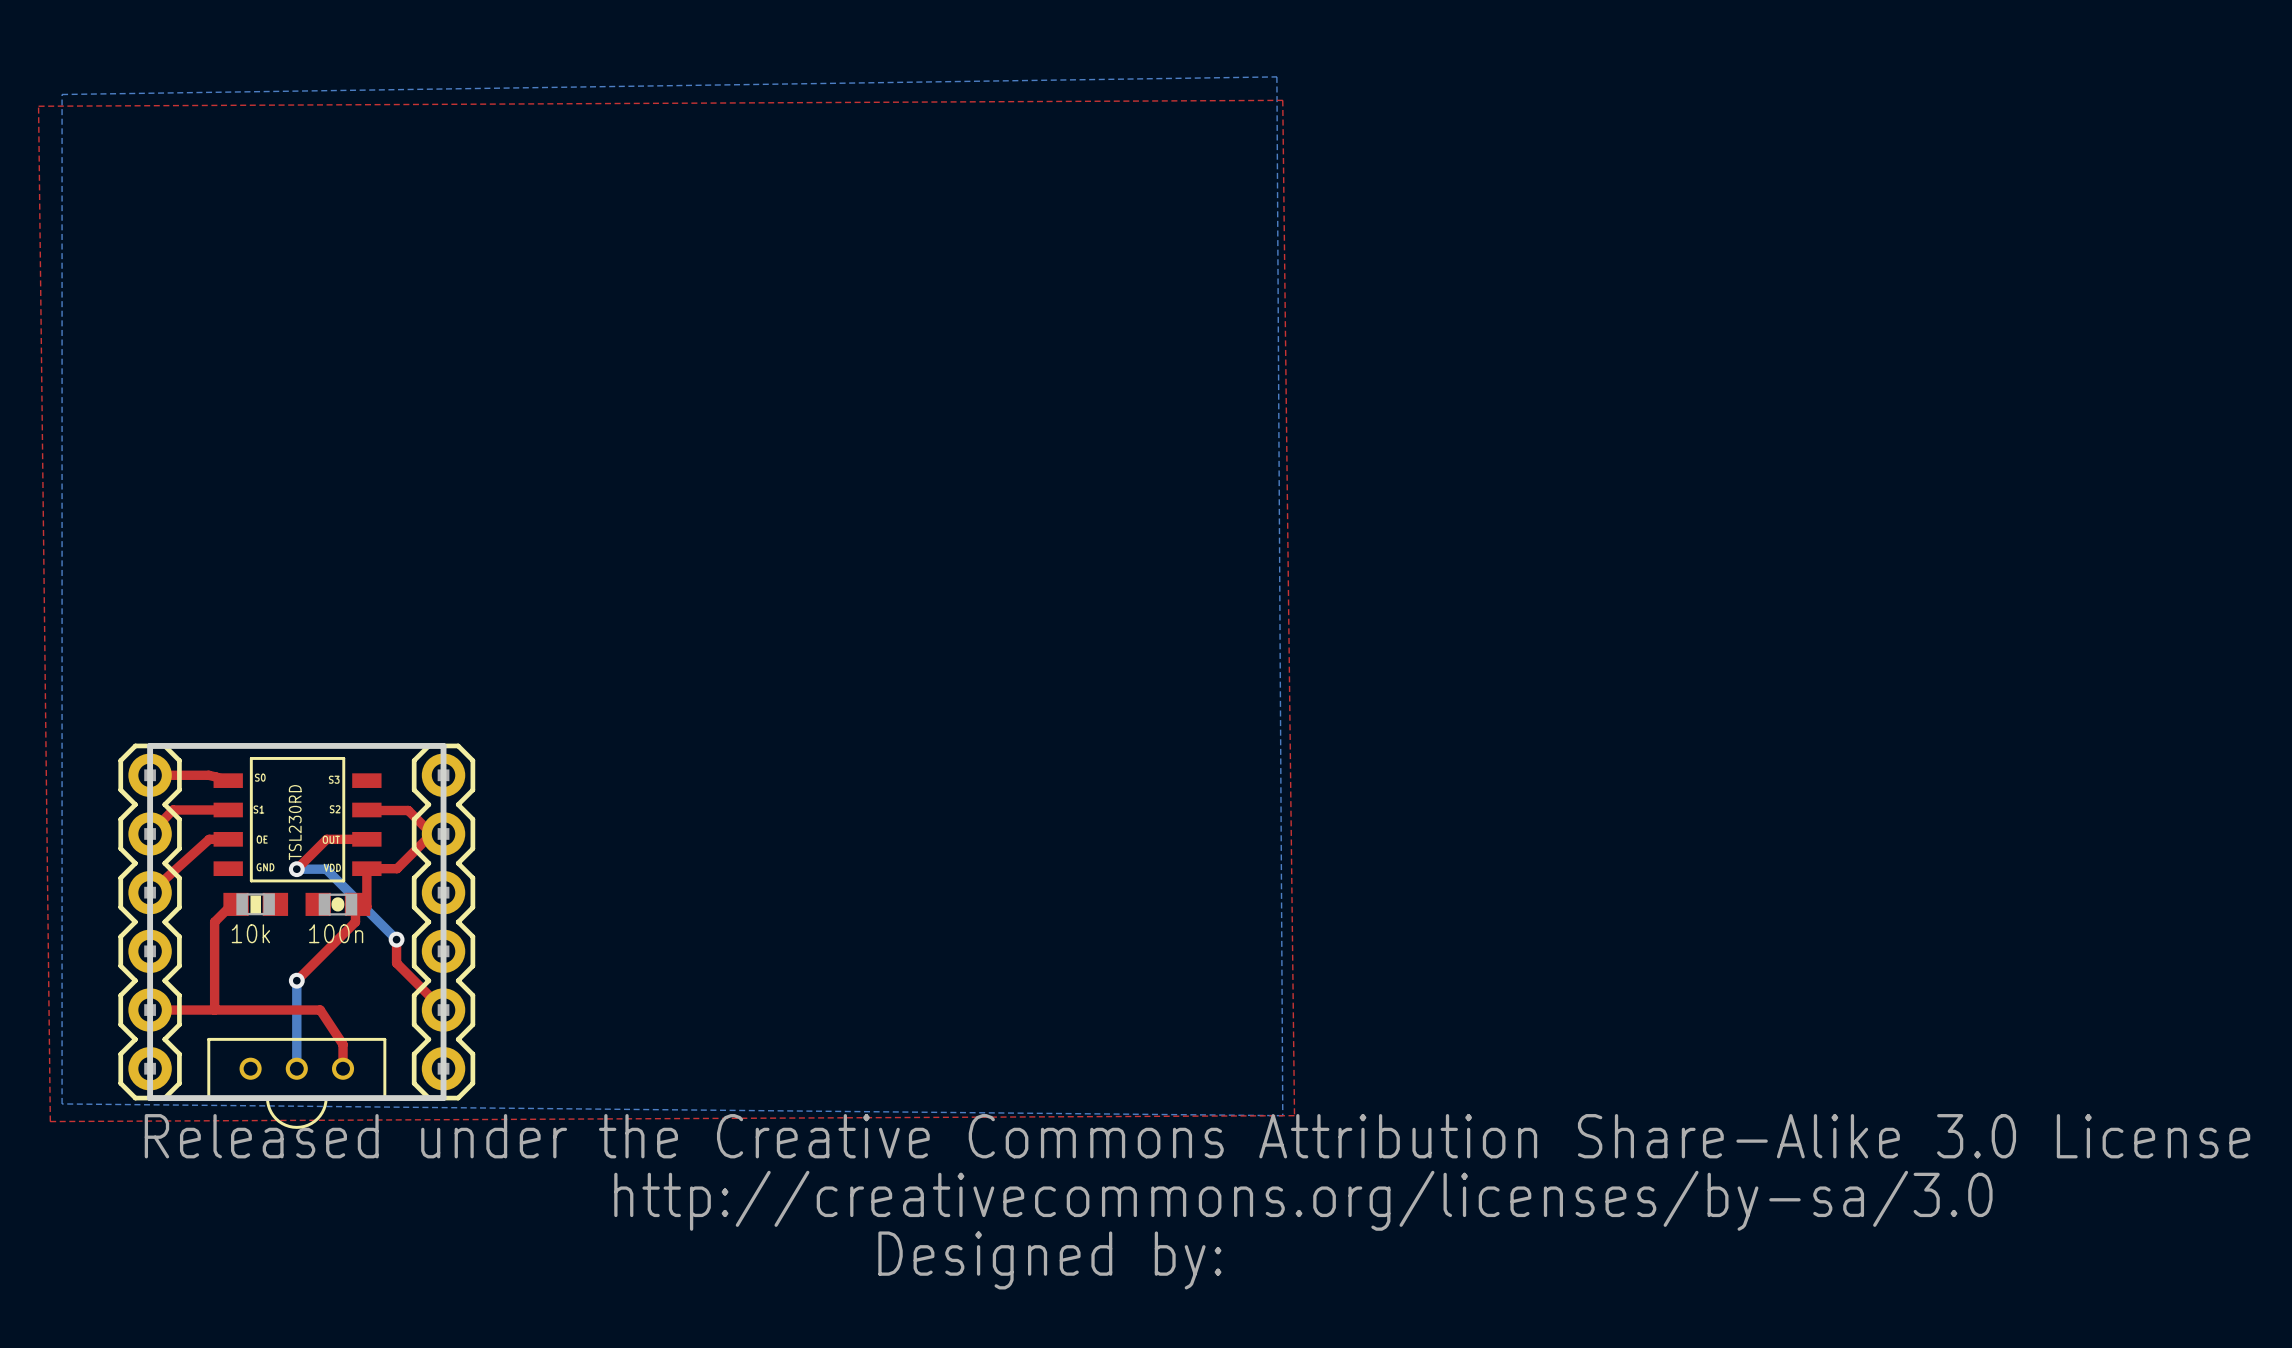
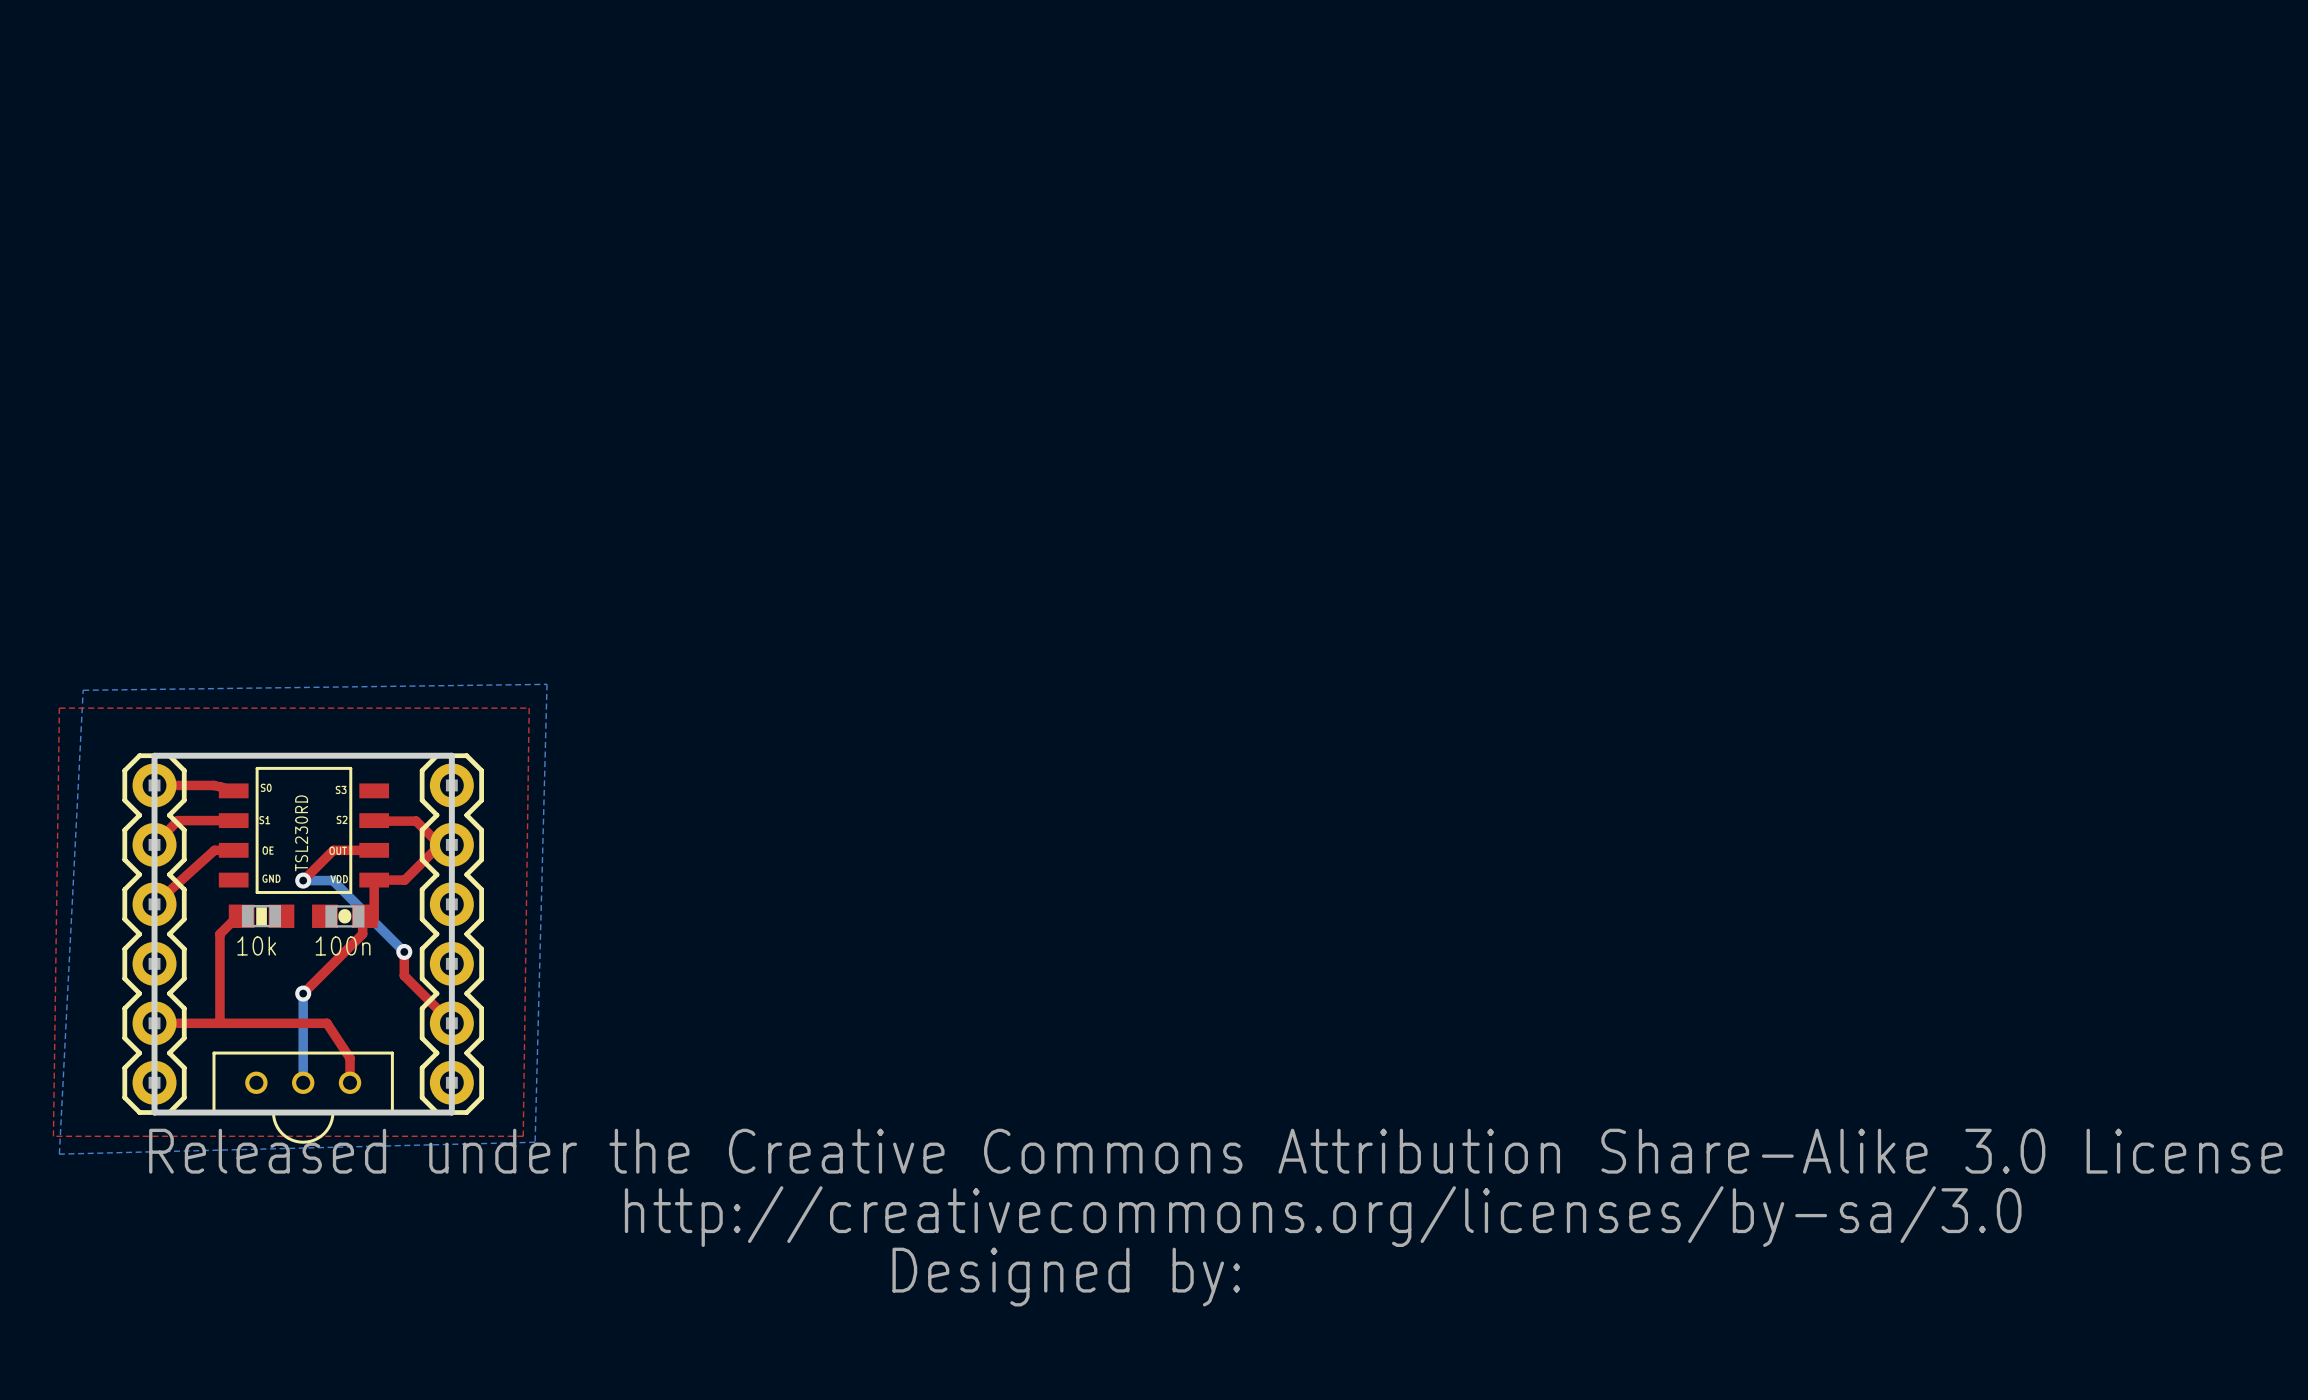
bottom zone outline: (1276, 76) (62, 94) (62, 1103) (1282, 1115) (1276, 76) -> none
top zone outline: (1282, 100) (38, 106) (50, 1121) (1294, 1115) (1282, 100) -> none
bottom zone outline: none -> (547, 684) (83, 690) (59, 1154) (535, 1142) (547, 684)
top zone outline: none -> (59, 708) (529, 708) (523, 1136) (53, 1136) (59, 708)

